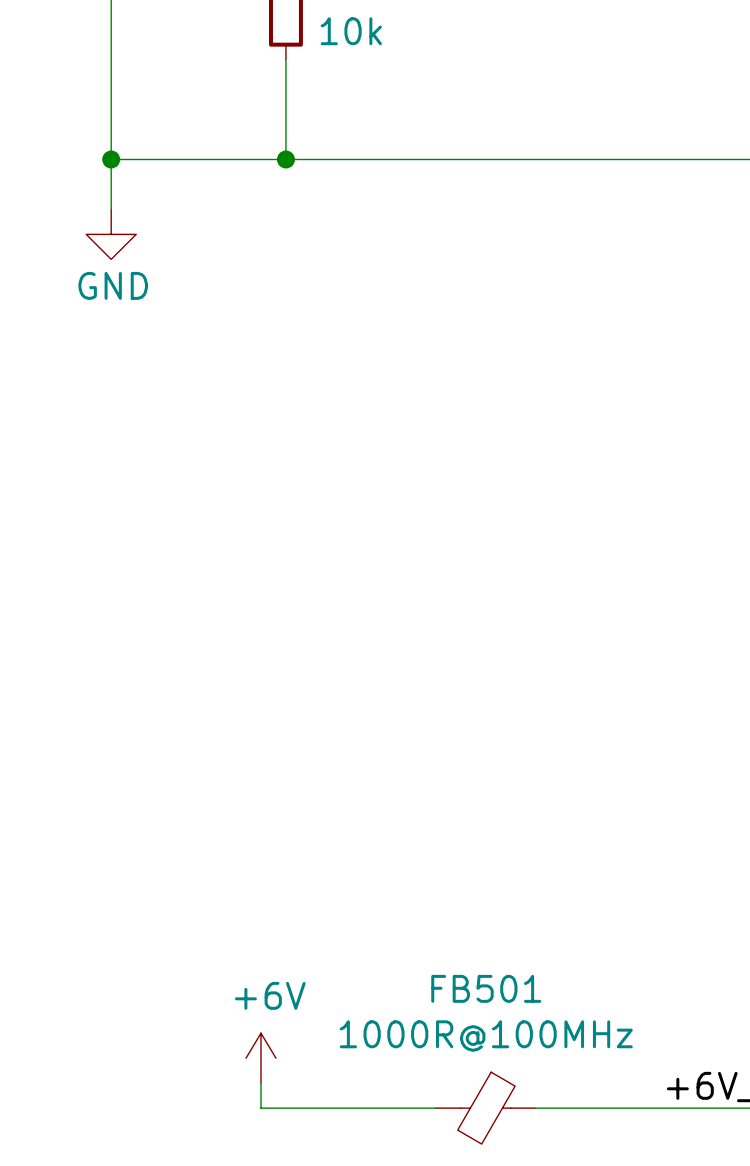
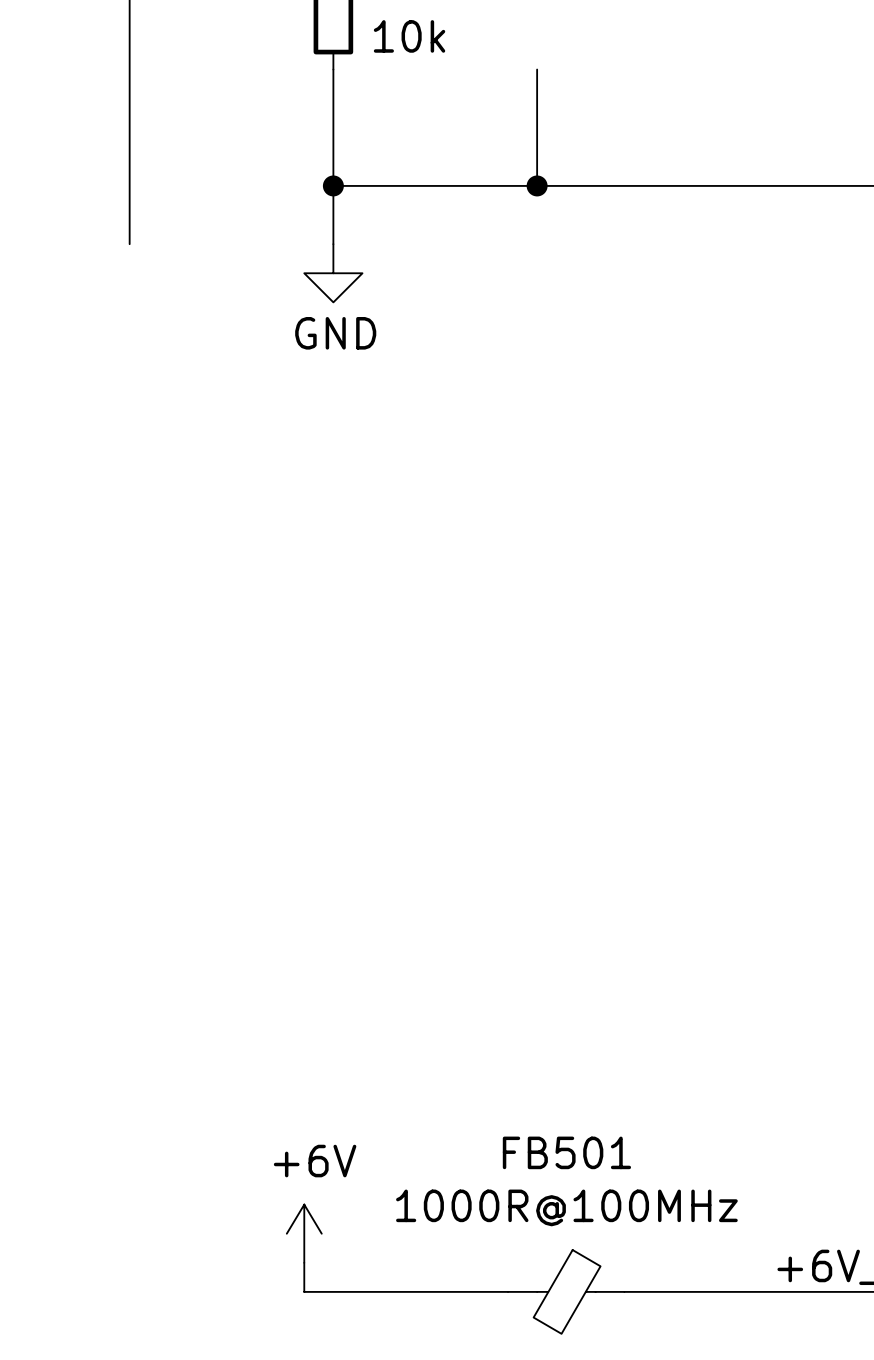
wire: none -> (537, 69) (537, 185)
wire: (111, 159) (285, 159) -> (333, 244) (333, 185)
junction: (111, 159) -> none
junction: none -> (537, 185)
power symbol position: GND (111, 234) -> GND (333, 273)

